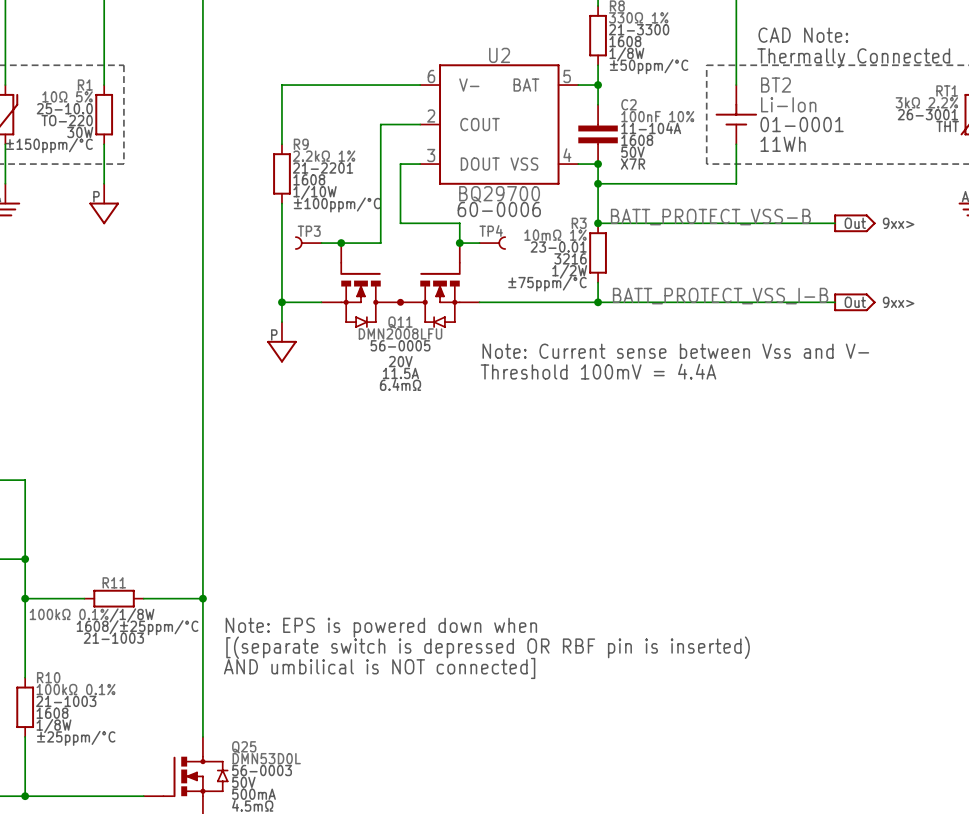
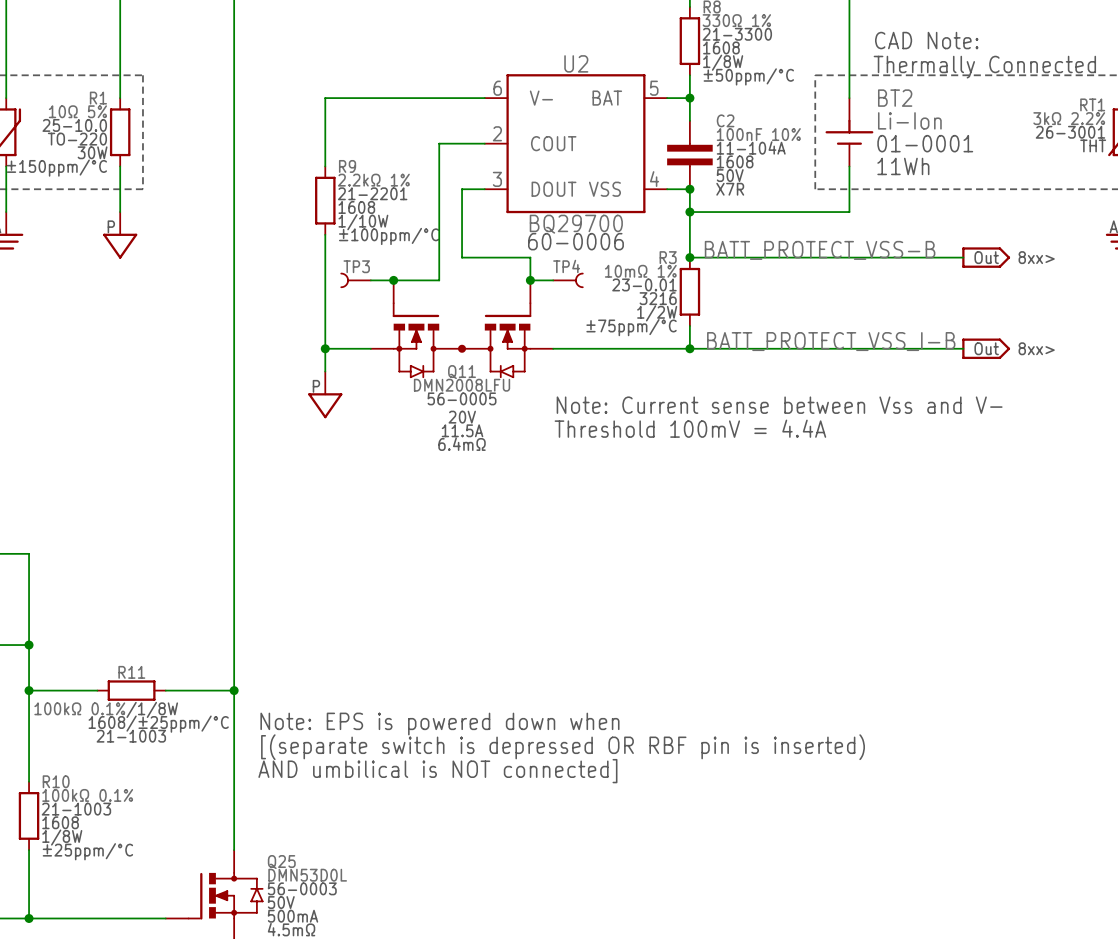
text: 9xx> (898, 223) -> 8xx> (1036, 257)
text: 9xx> (898, 302) -> 8xx> (1036, 348)

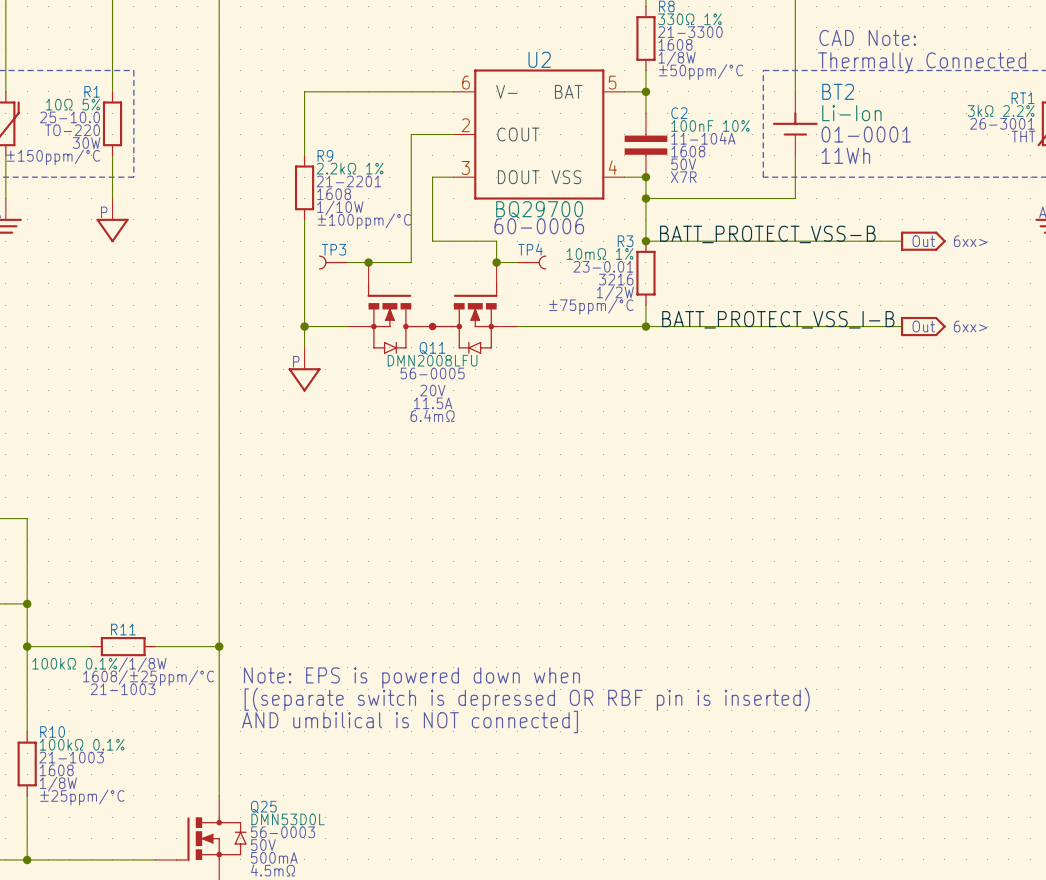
text: 8xx> (1036, 257) -> 6xx> (970, 241)
text: 8xx> (1036, 348) -> 6xx> (970, 326)
text: Note: Current sense between Vss and V- (779, 405) -> none
text: Threshold 100mV = 4.4A (690, 428) -> none

